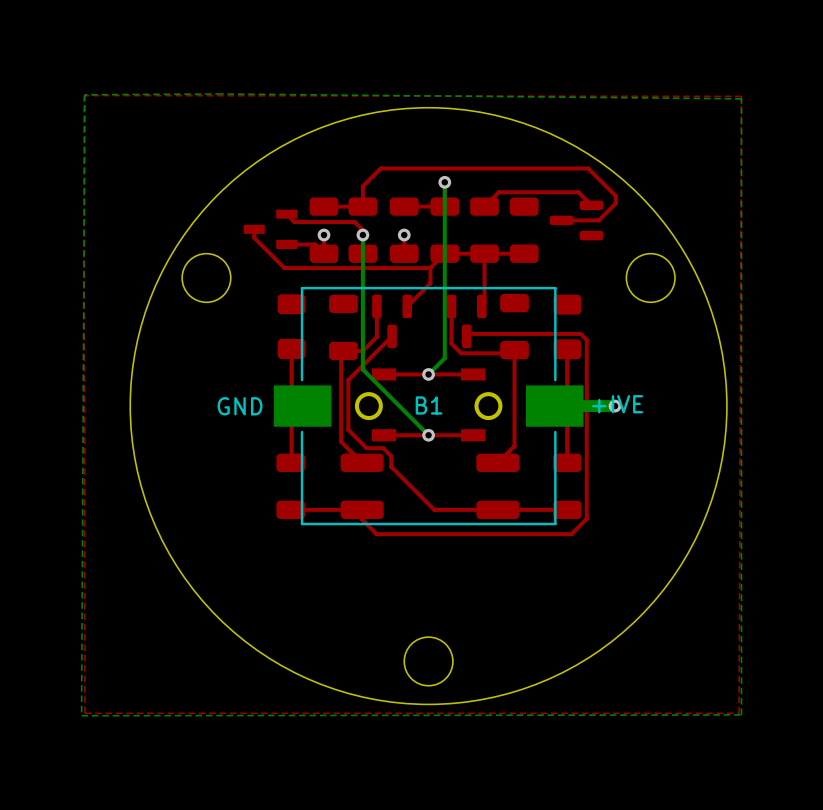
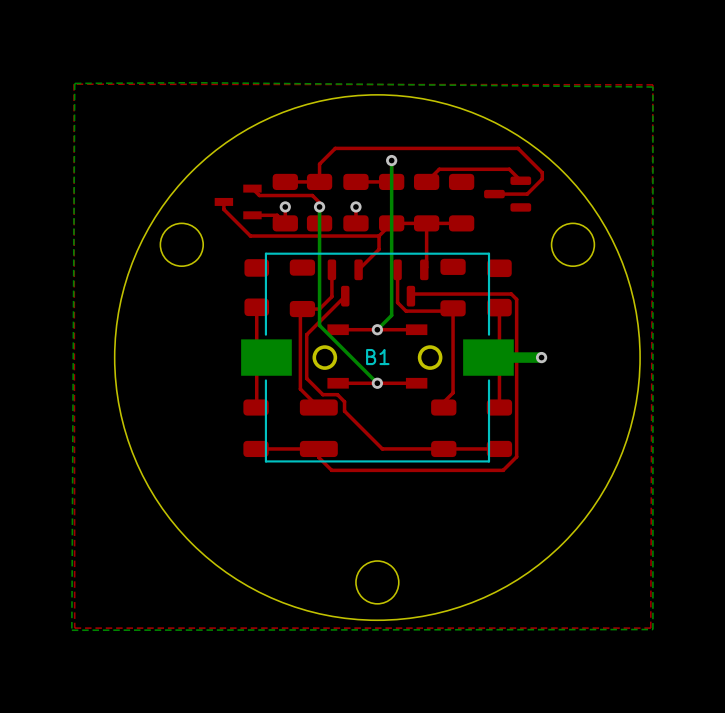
text: +IVE (617, 404) -> none
text: GND (240, 406) -> none
part footprint: [476, 453, 520, 520] -> [431, 399, 457, 458]

